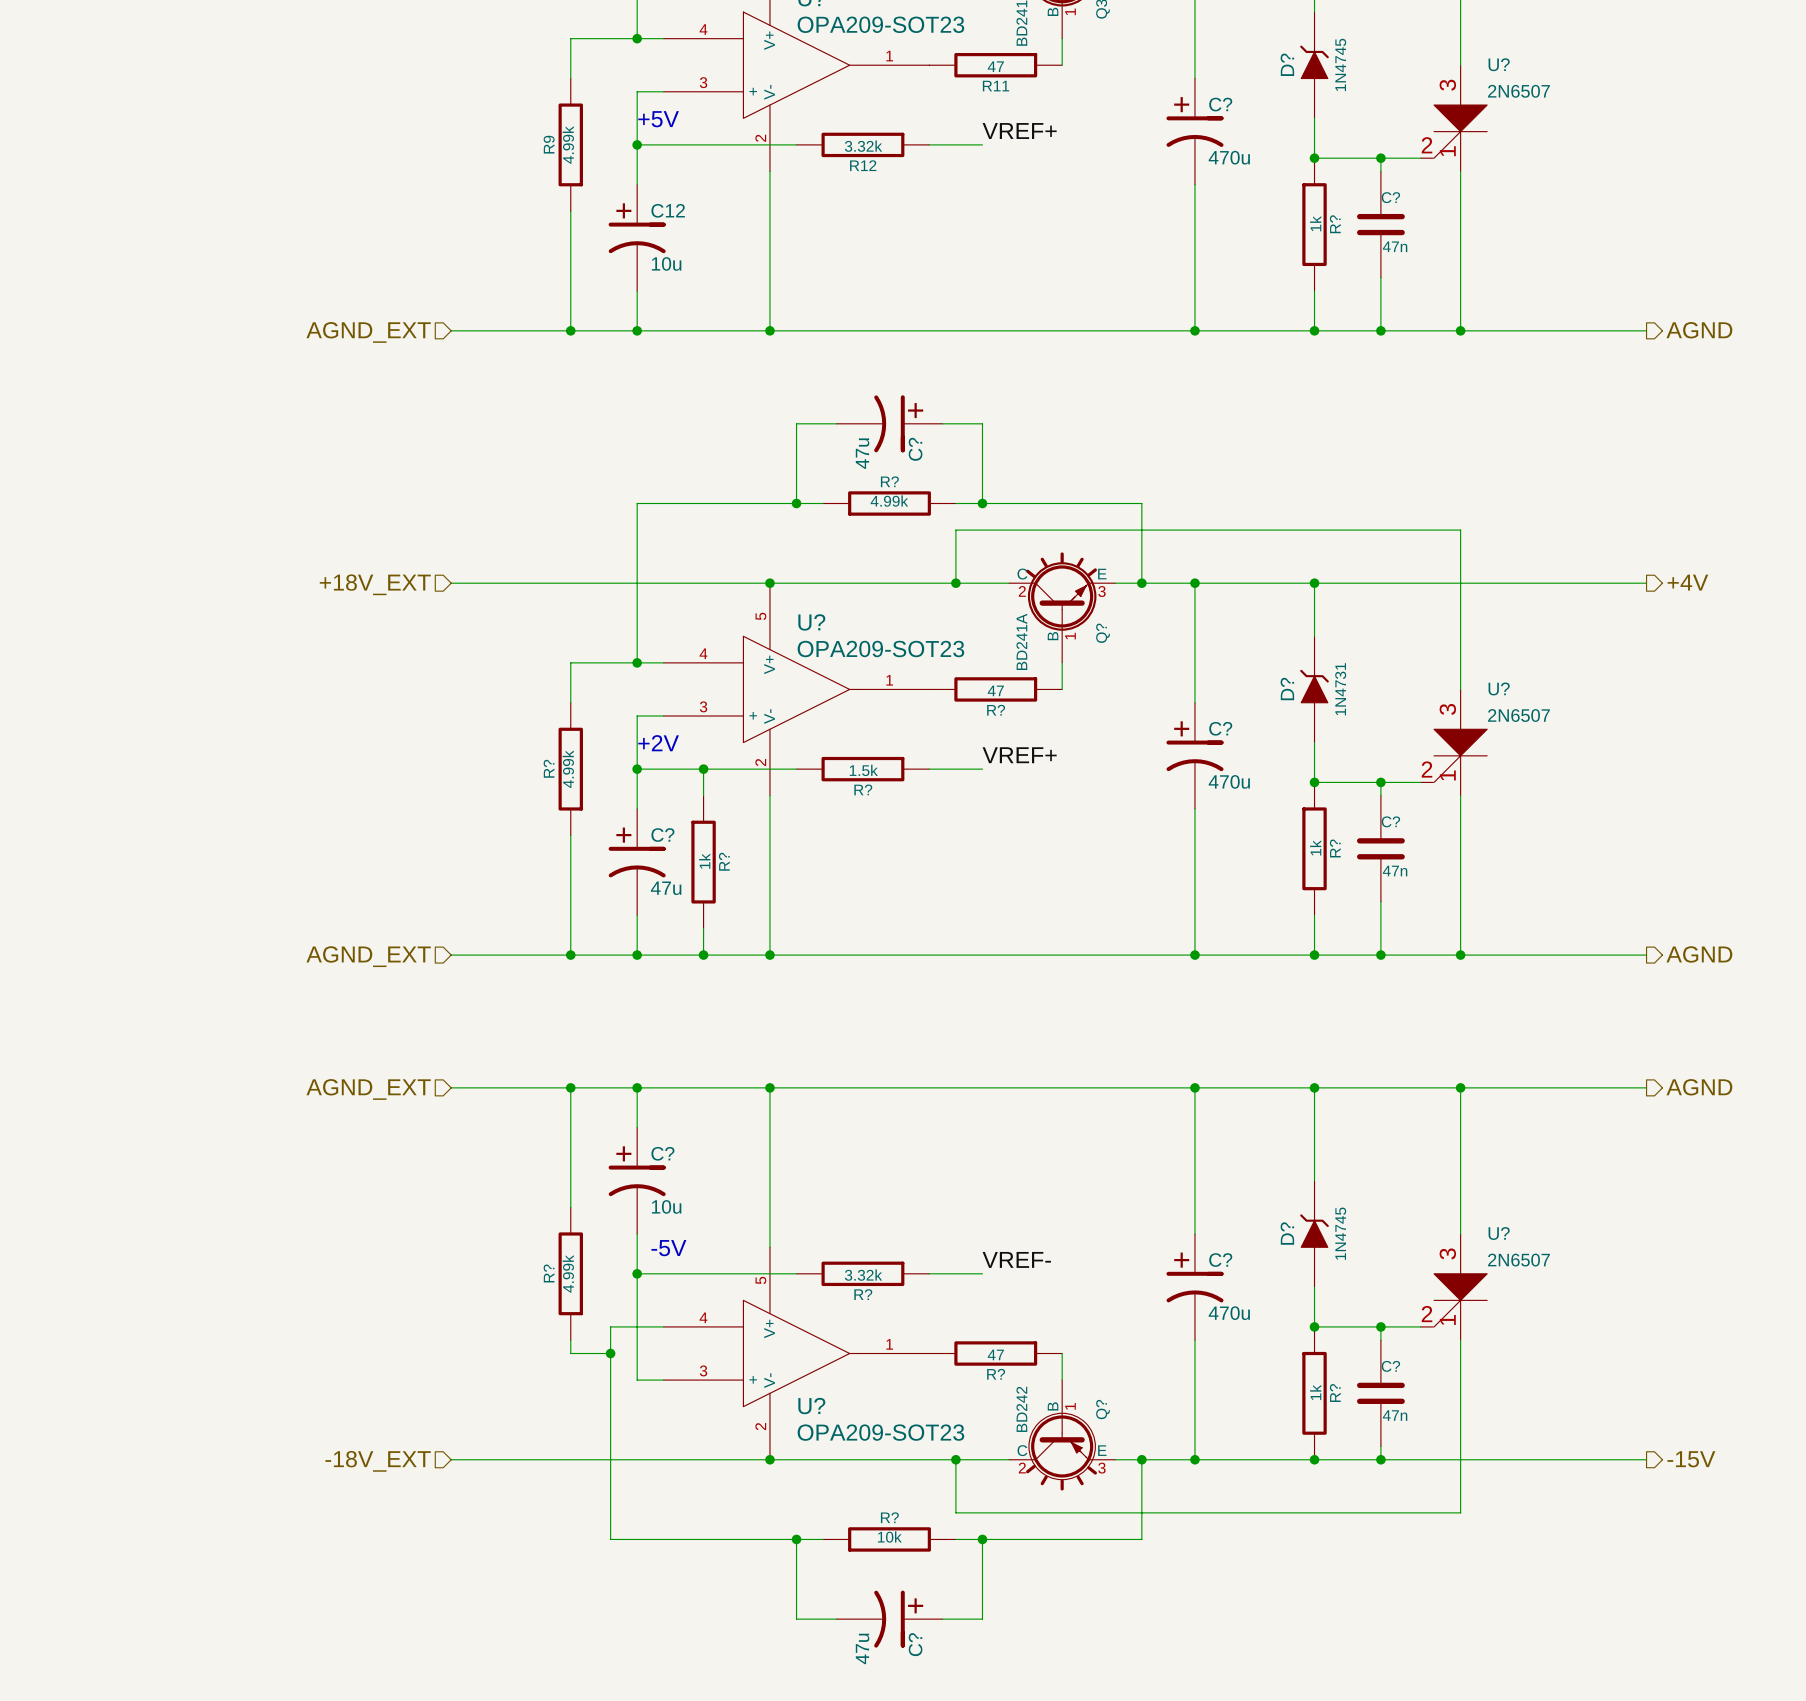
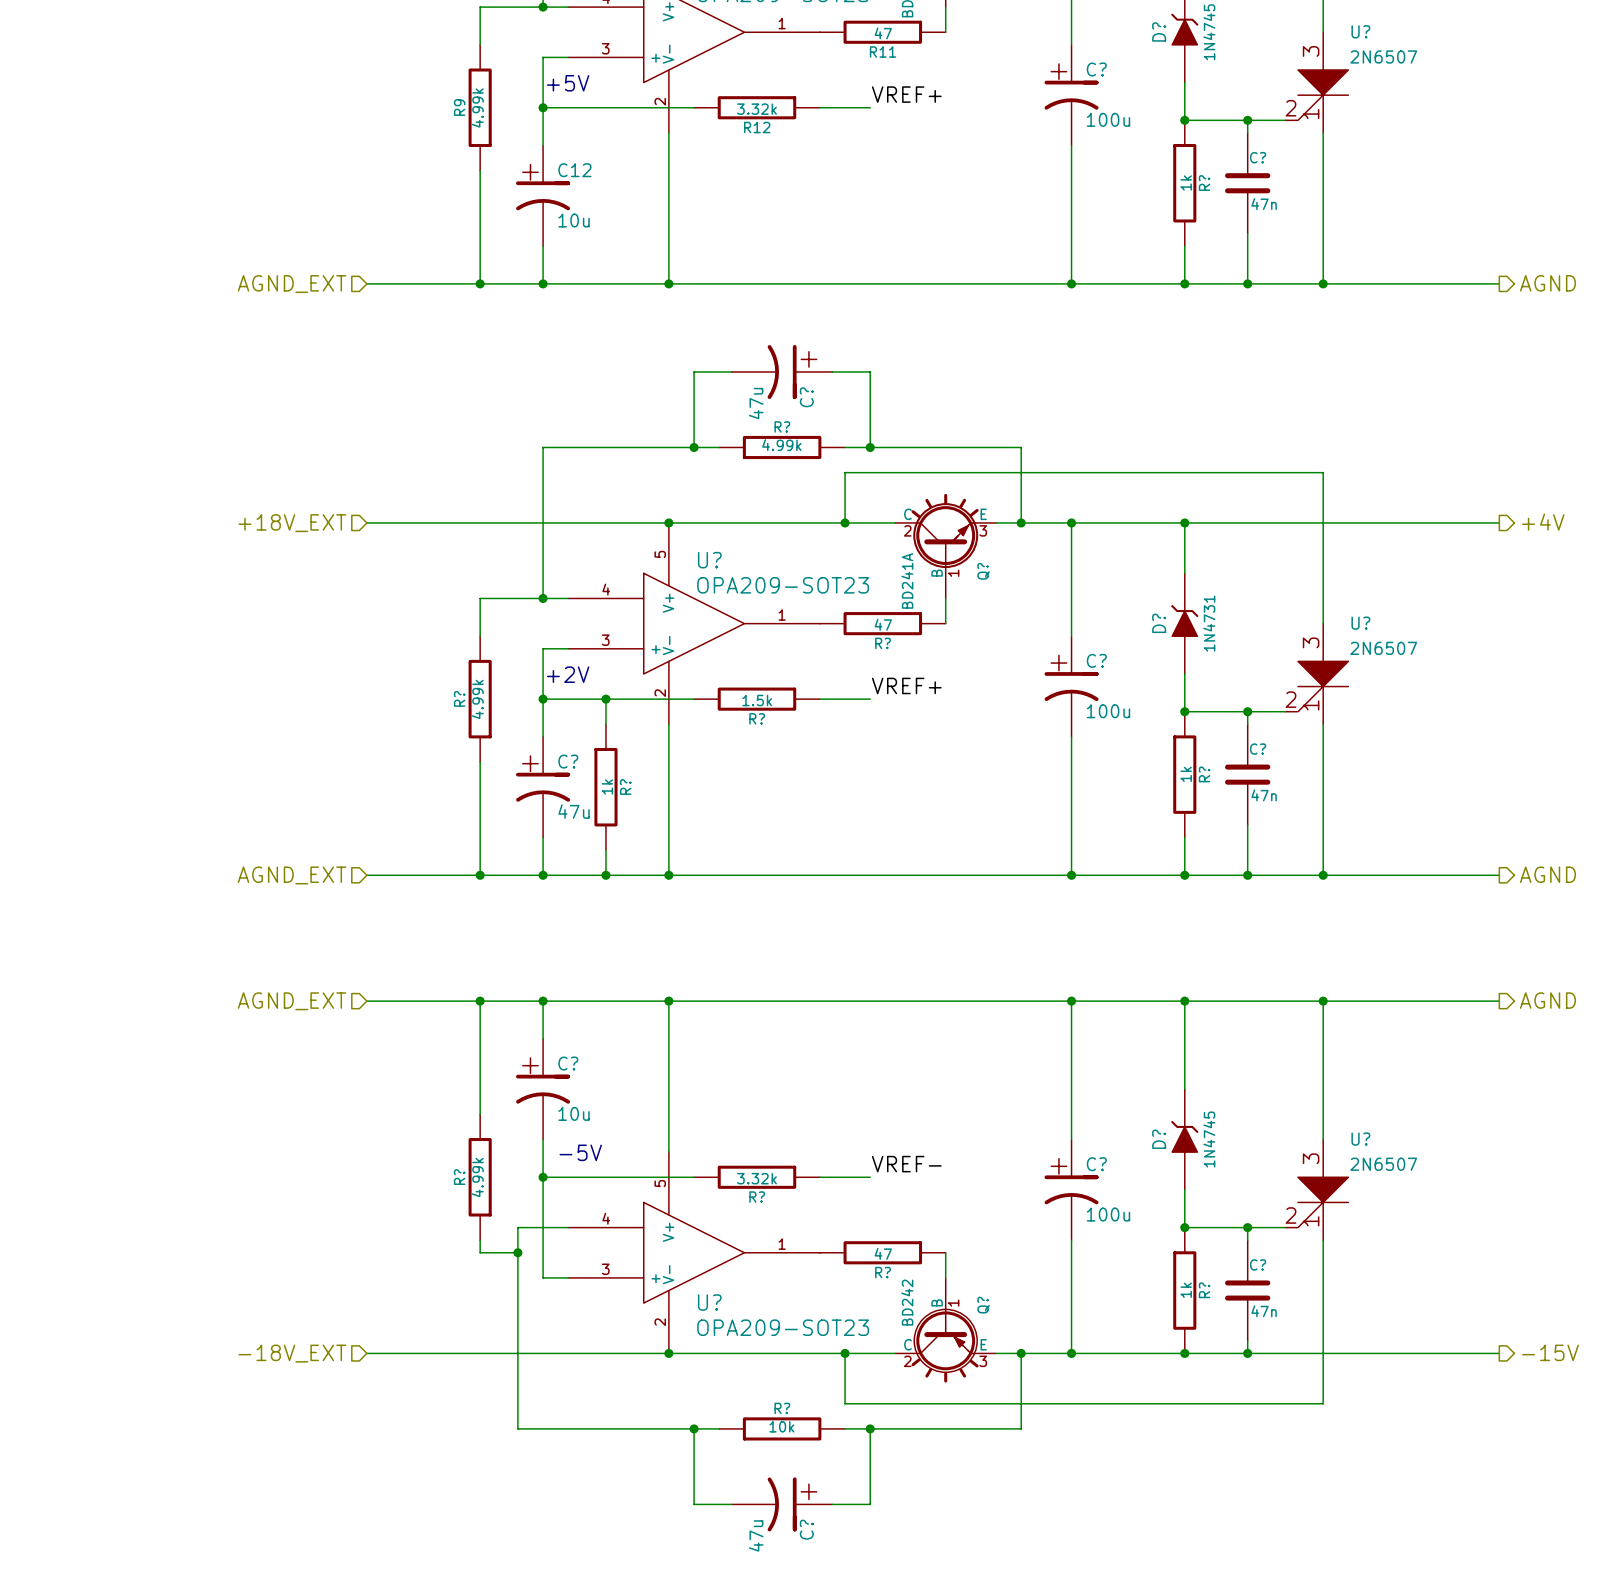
C? value: 470u (1229, 157) -> 100u (1108, 119)
C? value: 470u (1229, 781) -> 100u (1108, 711)
C? value: 470u (1229, 1313) -> 100u (1108, 1214)

